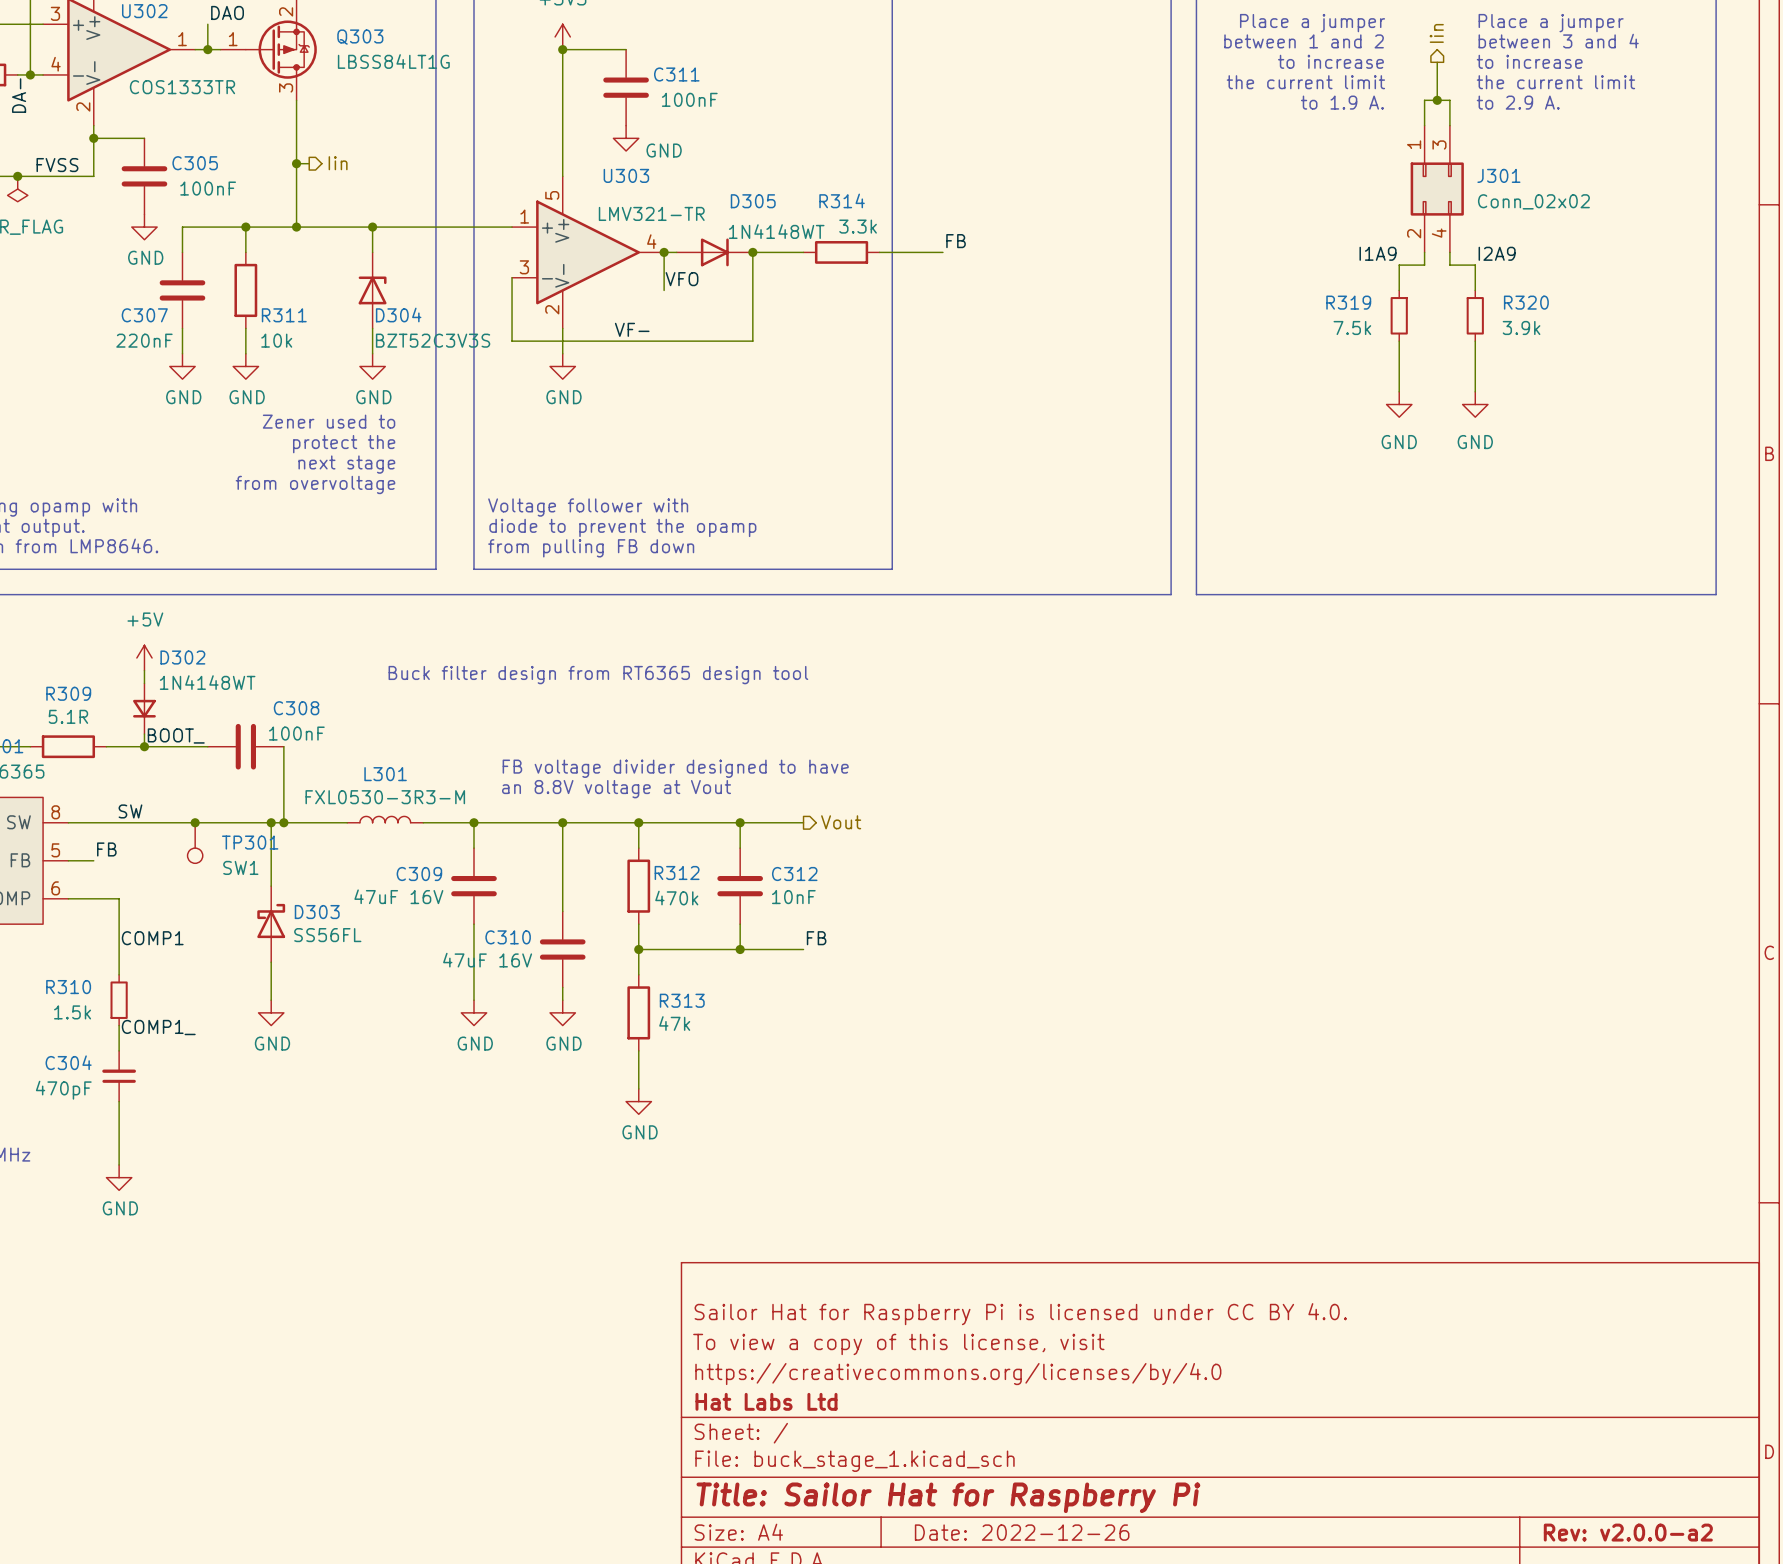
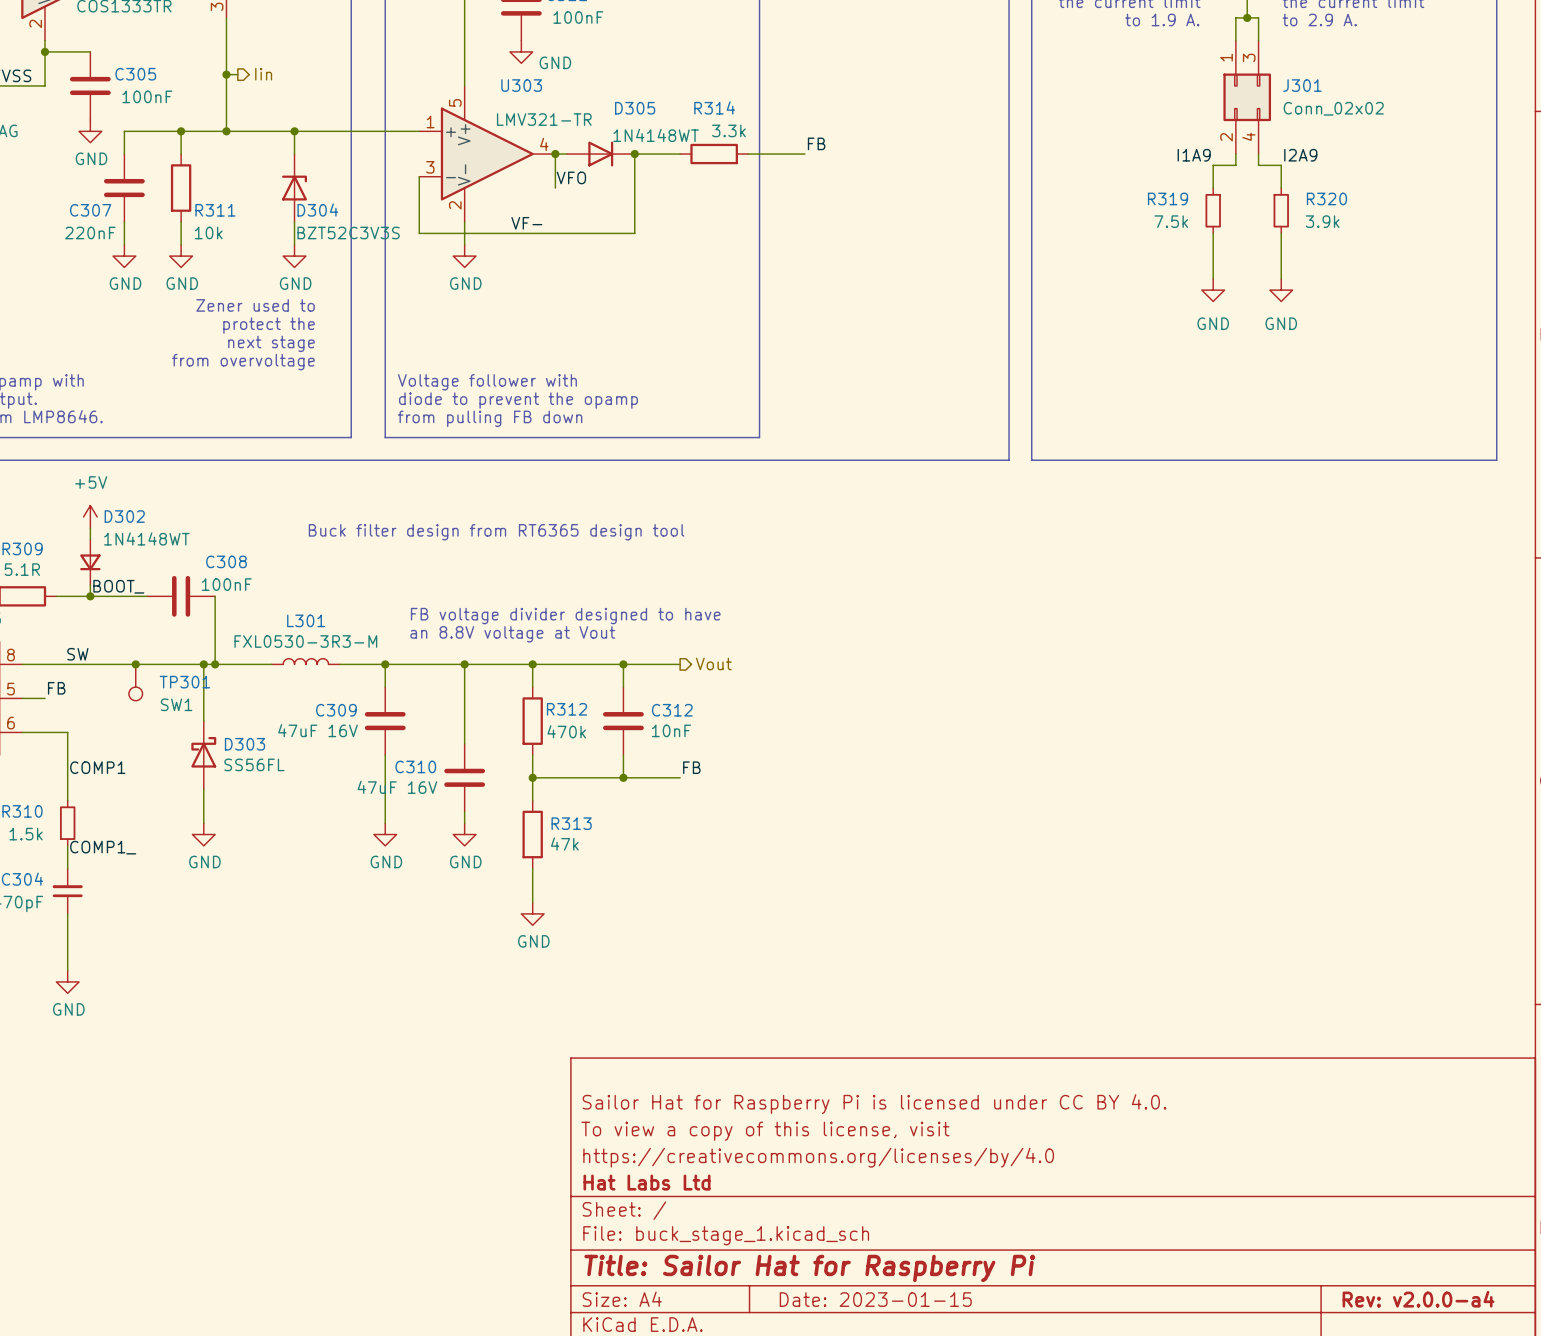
title block: Date: 2022-12-26 (1022, 1532) -> Date: 2023-01-15 (875, 1299)
title block: Rev: v2.0.0-a2 (1628, 1532) -> Rev: v2.0.0-a4 (1418, 1299)

